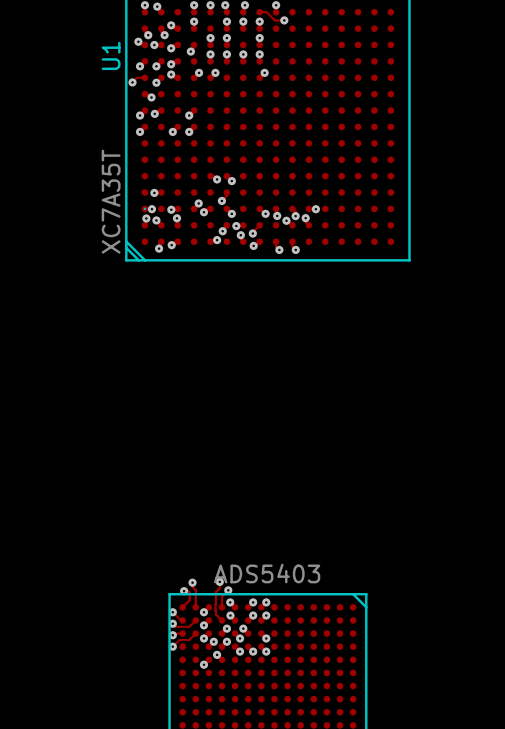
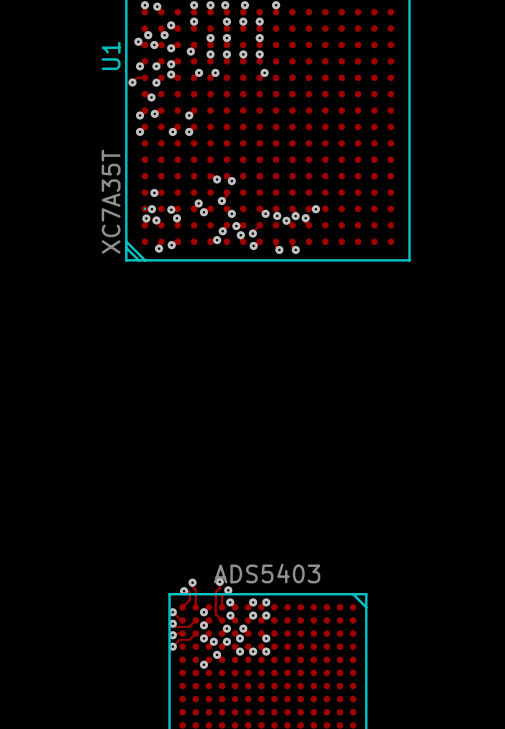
top track: (259, 12) (266, 12) (274, 20) (284, 20) -> none
via: (284, 20) -> none

